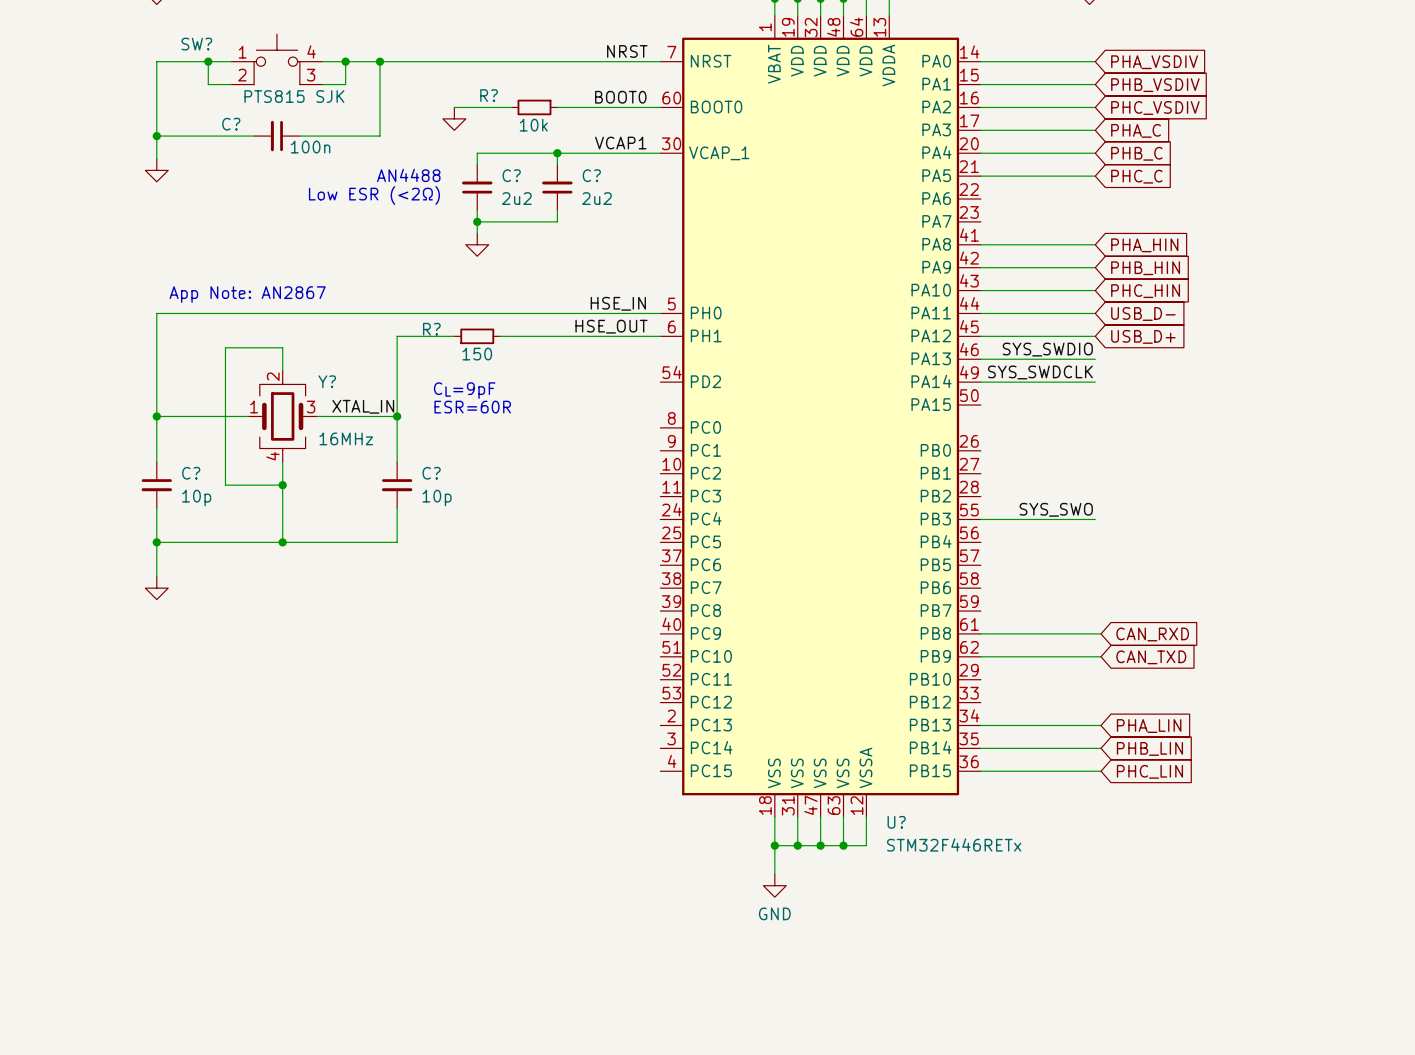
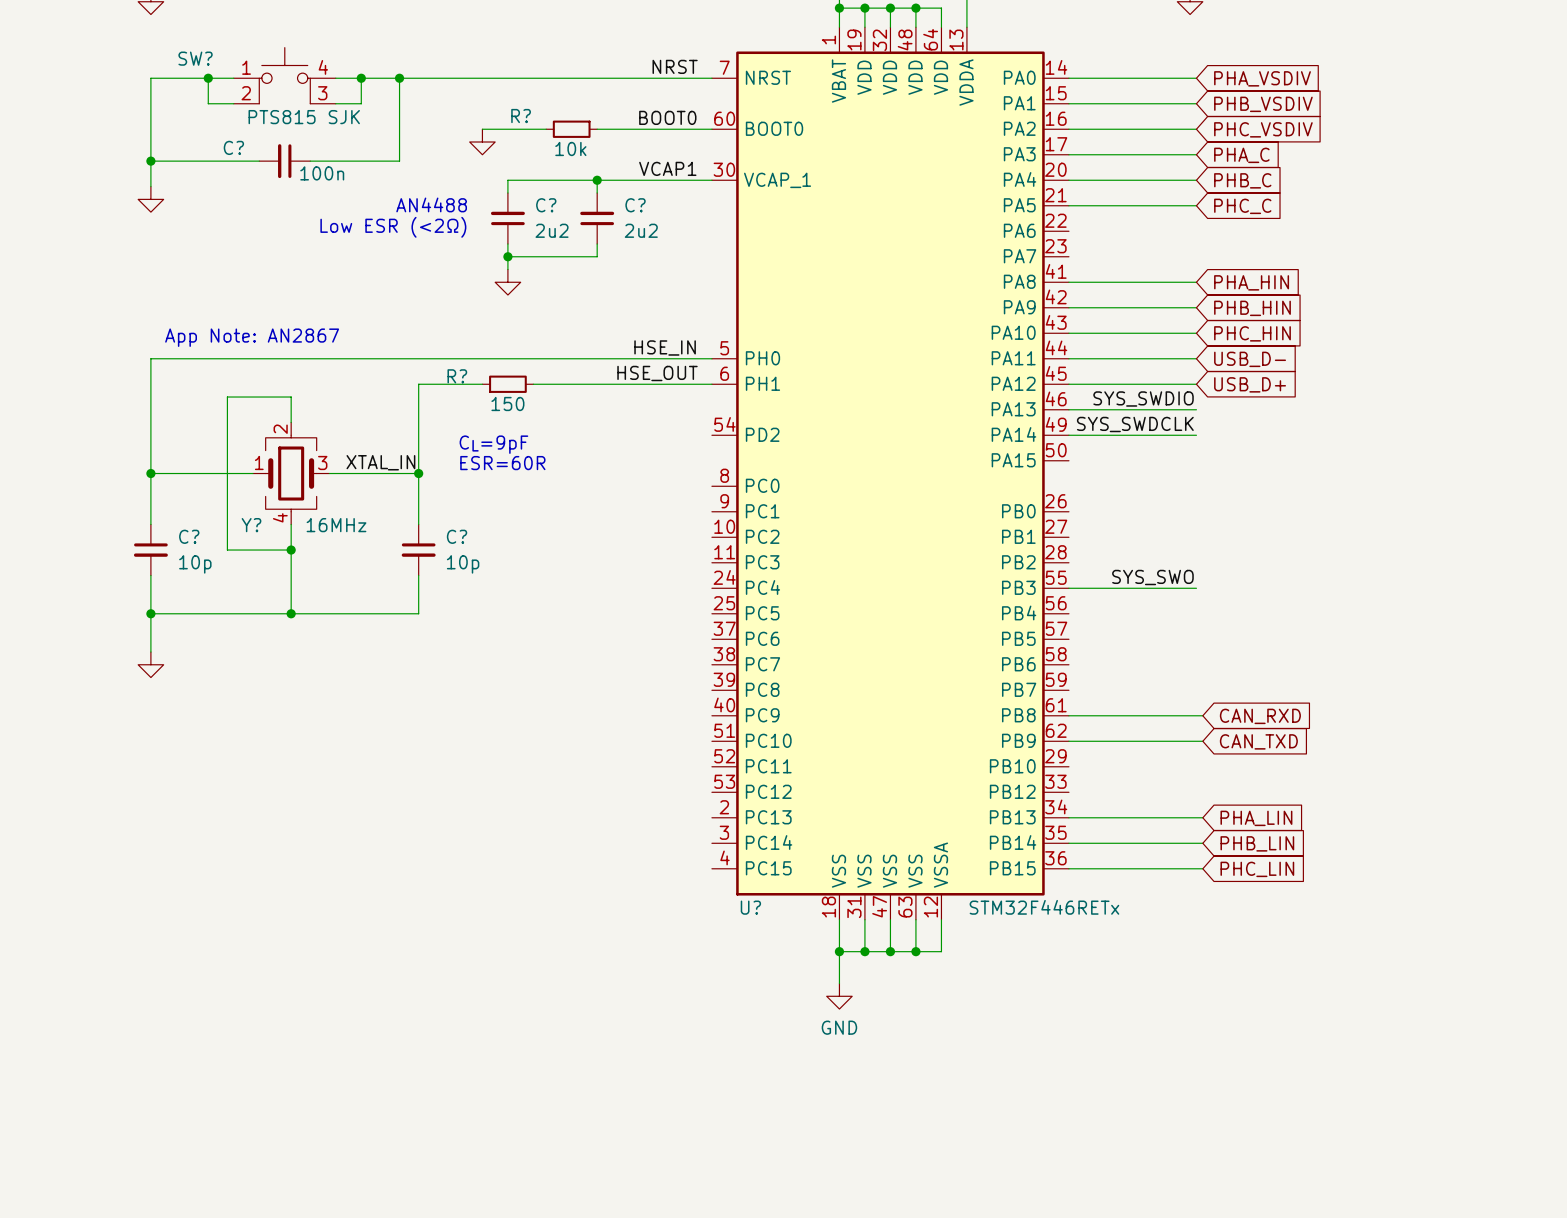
Y? name position: Y? (327, 381) -> Y? (251, 525)
Y? value position: 16MHz (346, 438) -> 16MHz (336, 525)
U? name position: U? (896, 822) -> U? (750, 907)
U? value position: STM32F446RETx (954, 844) -> STM32F446RETx (1044, 907)

